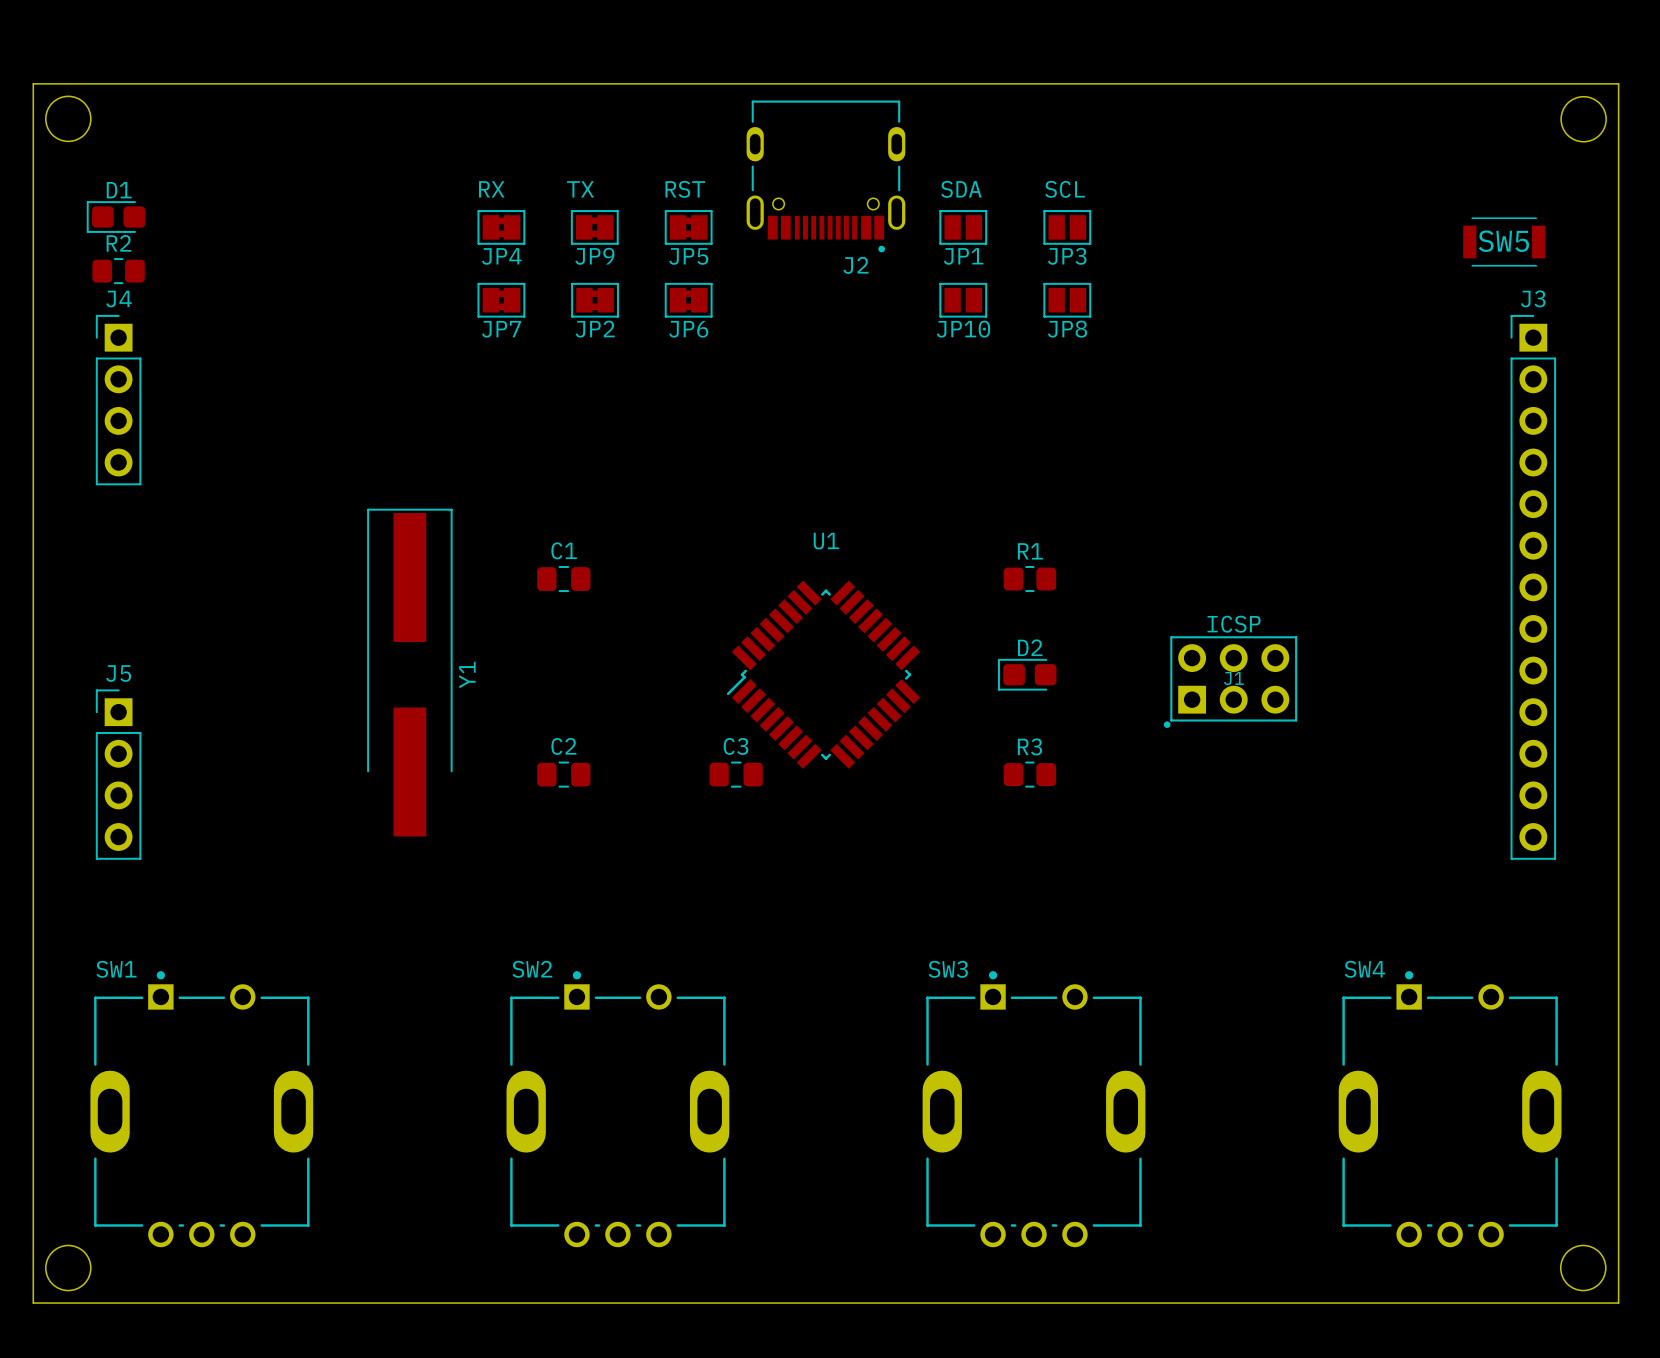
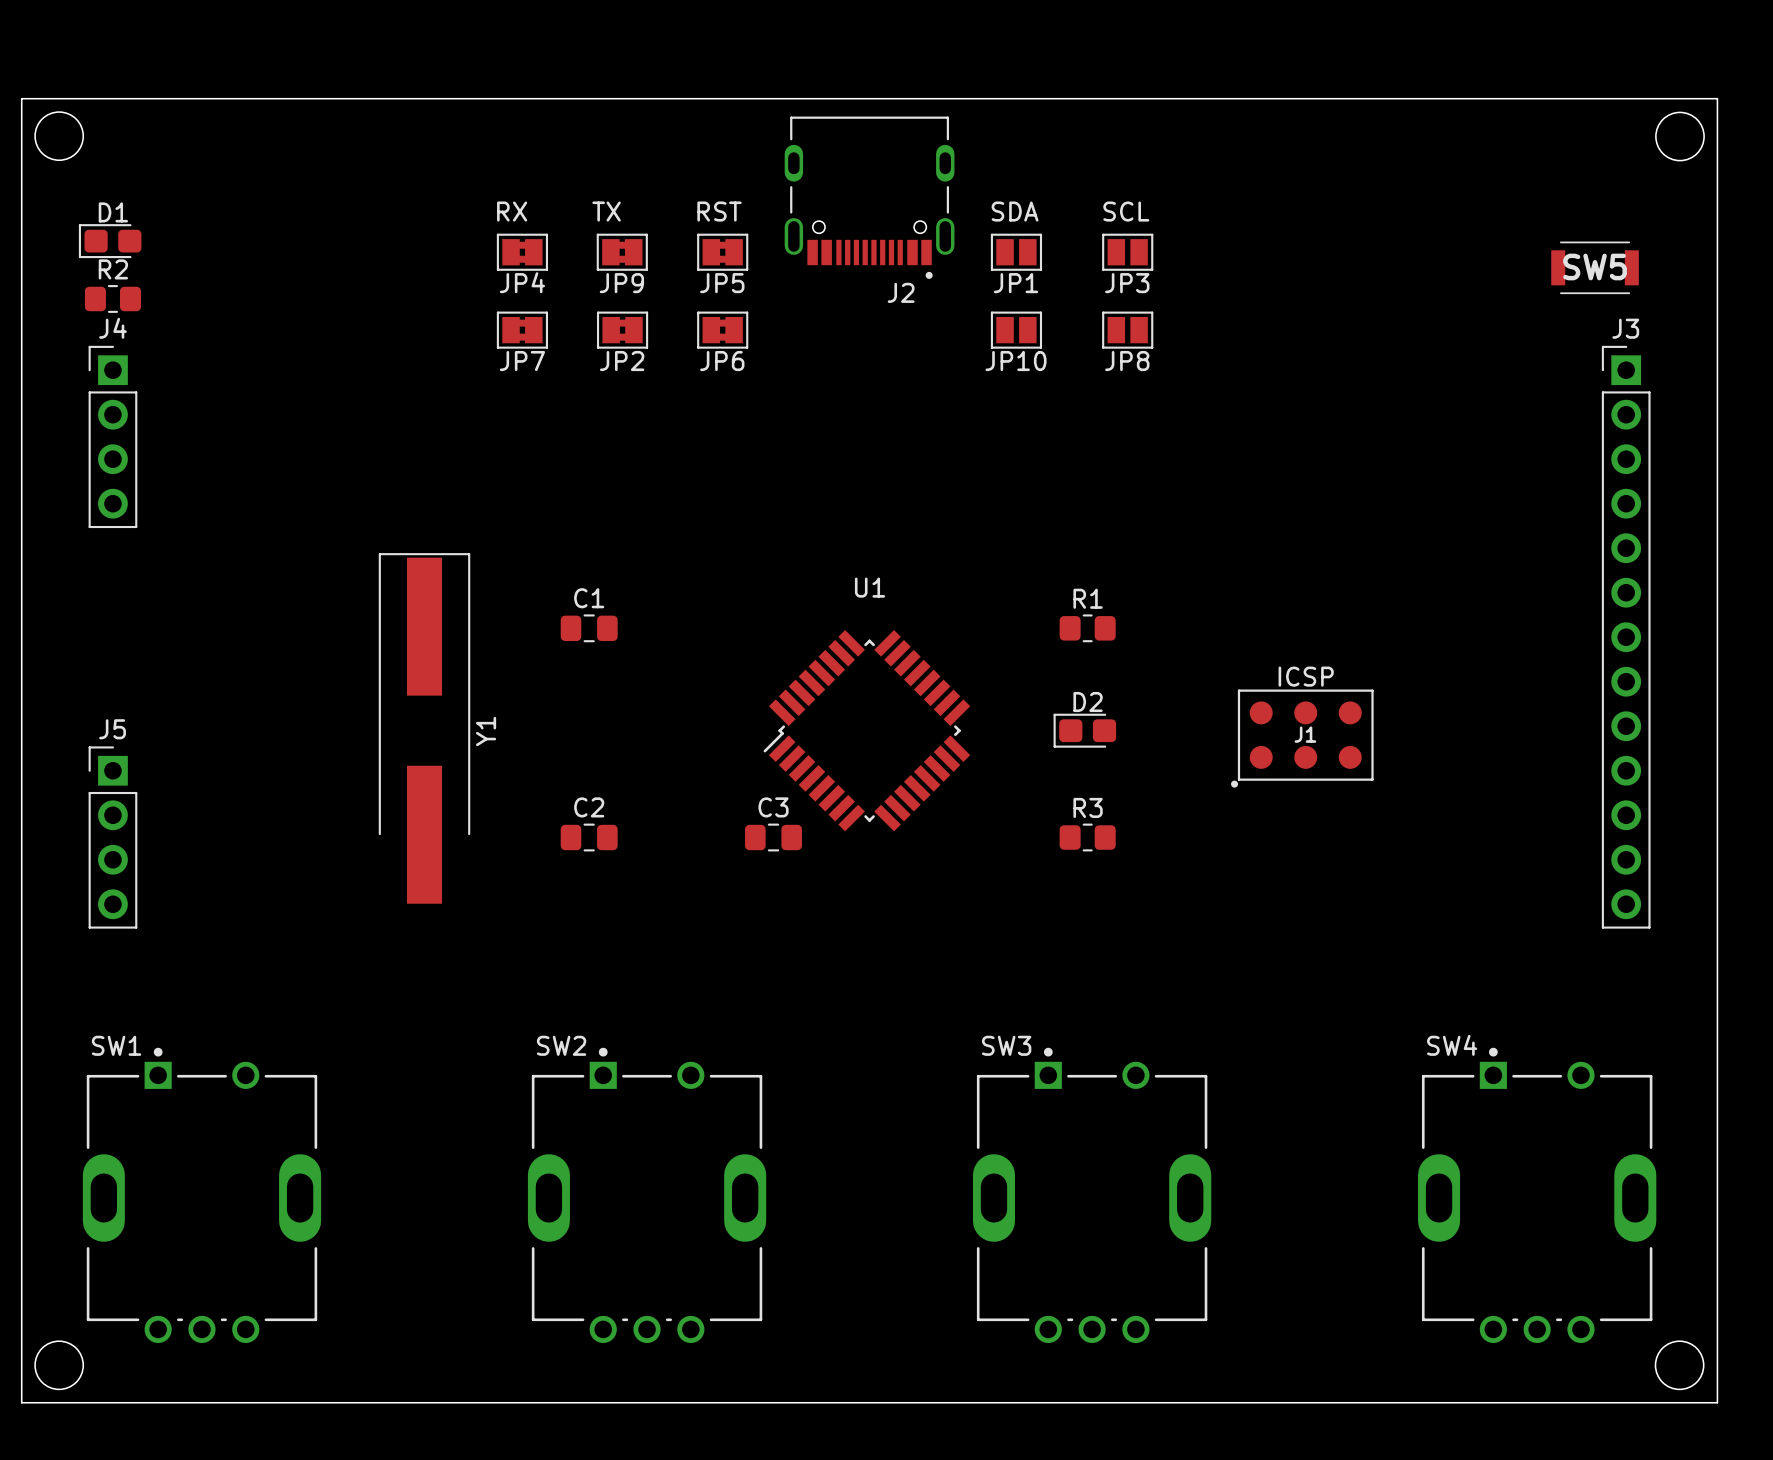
J1 footprint: [1163, 636, 1298, 728] -> [1231, 689, 1374, 788]

